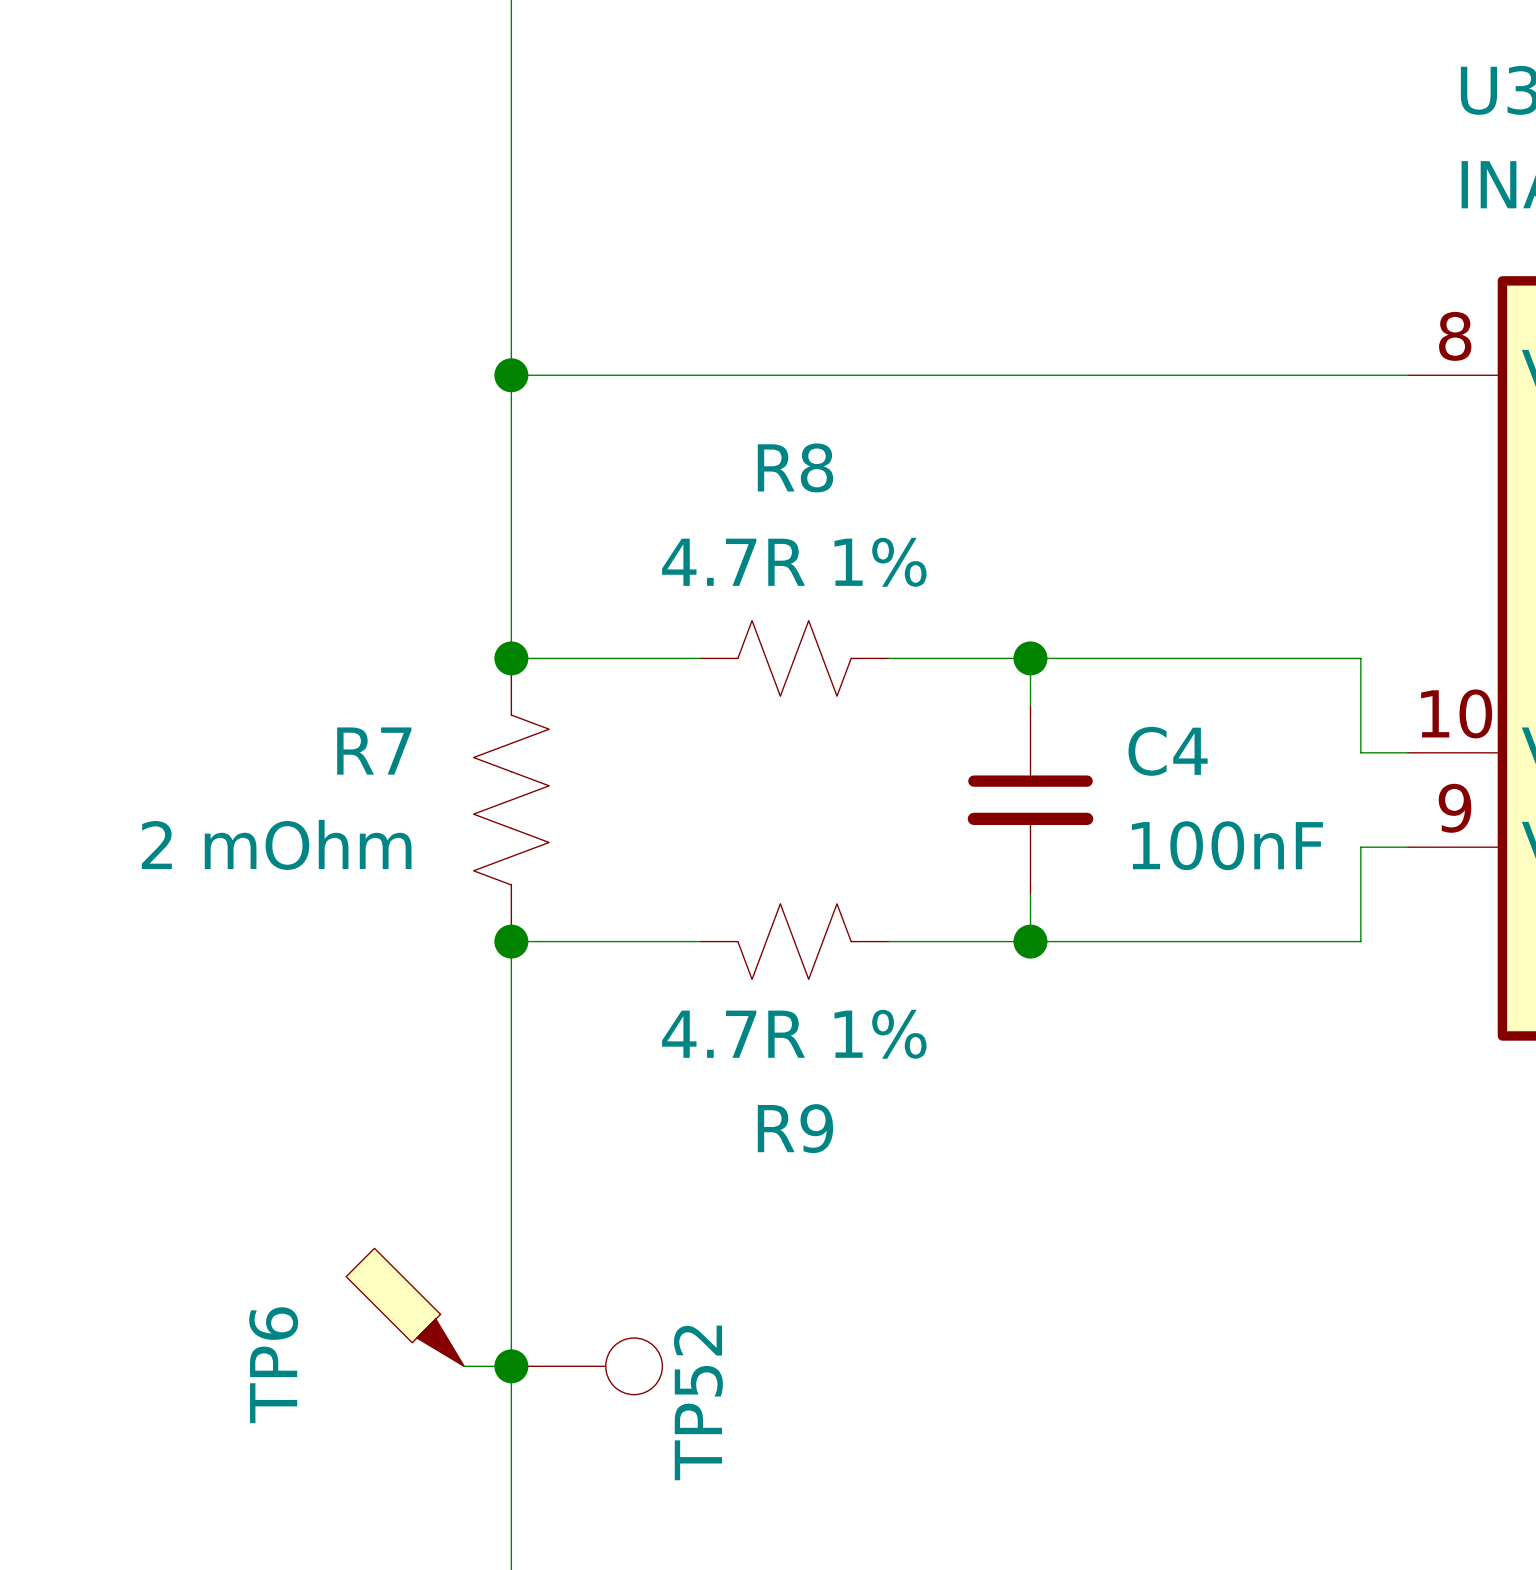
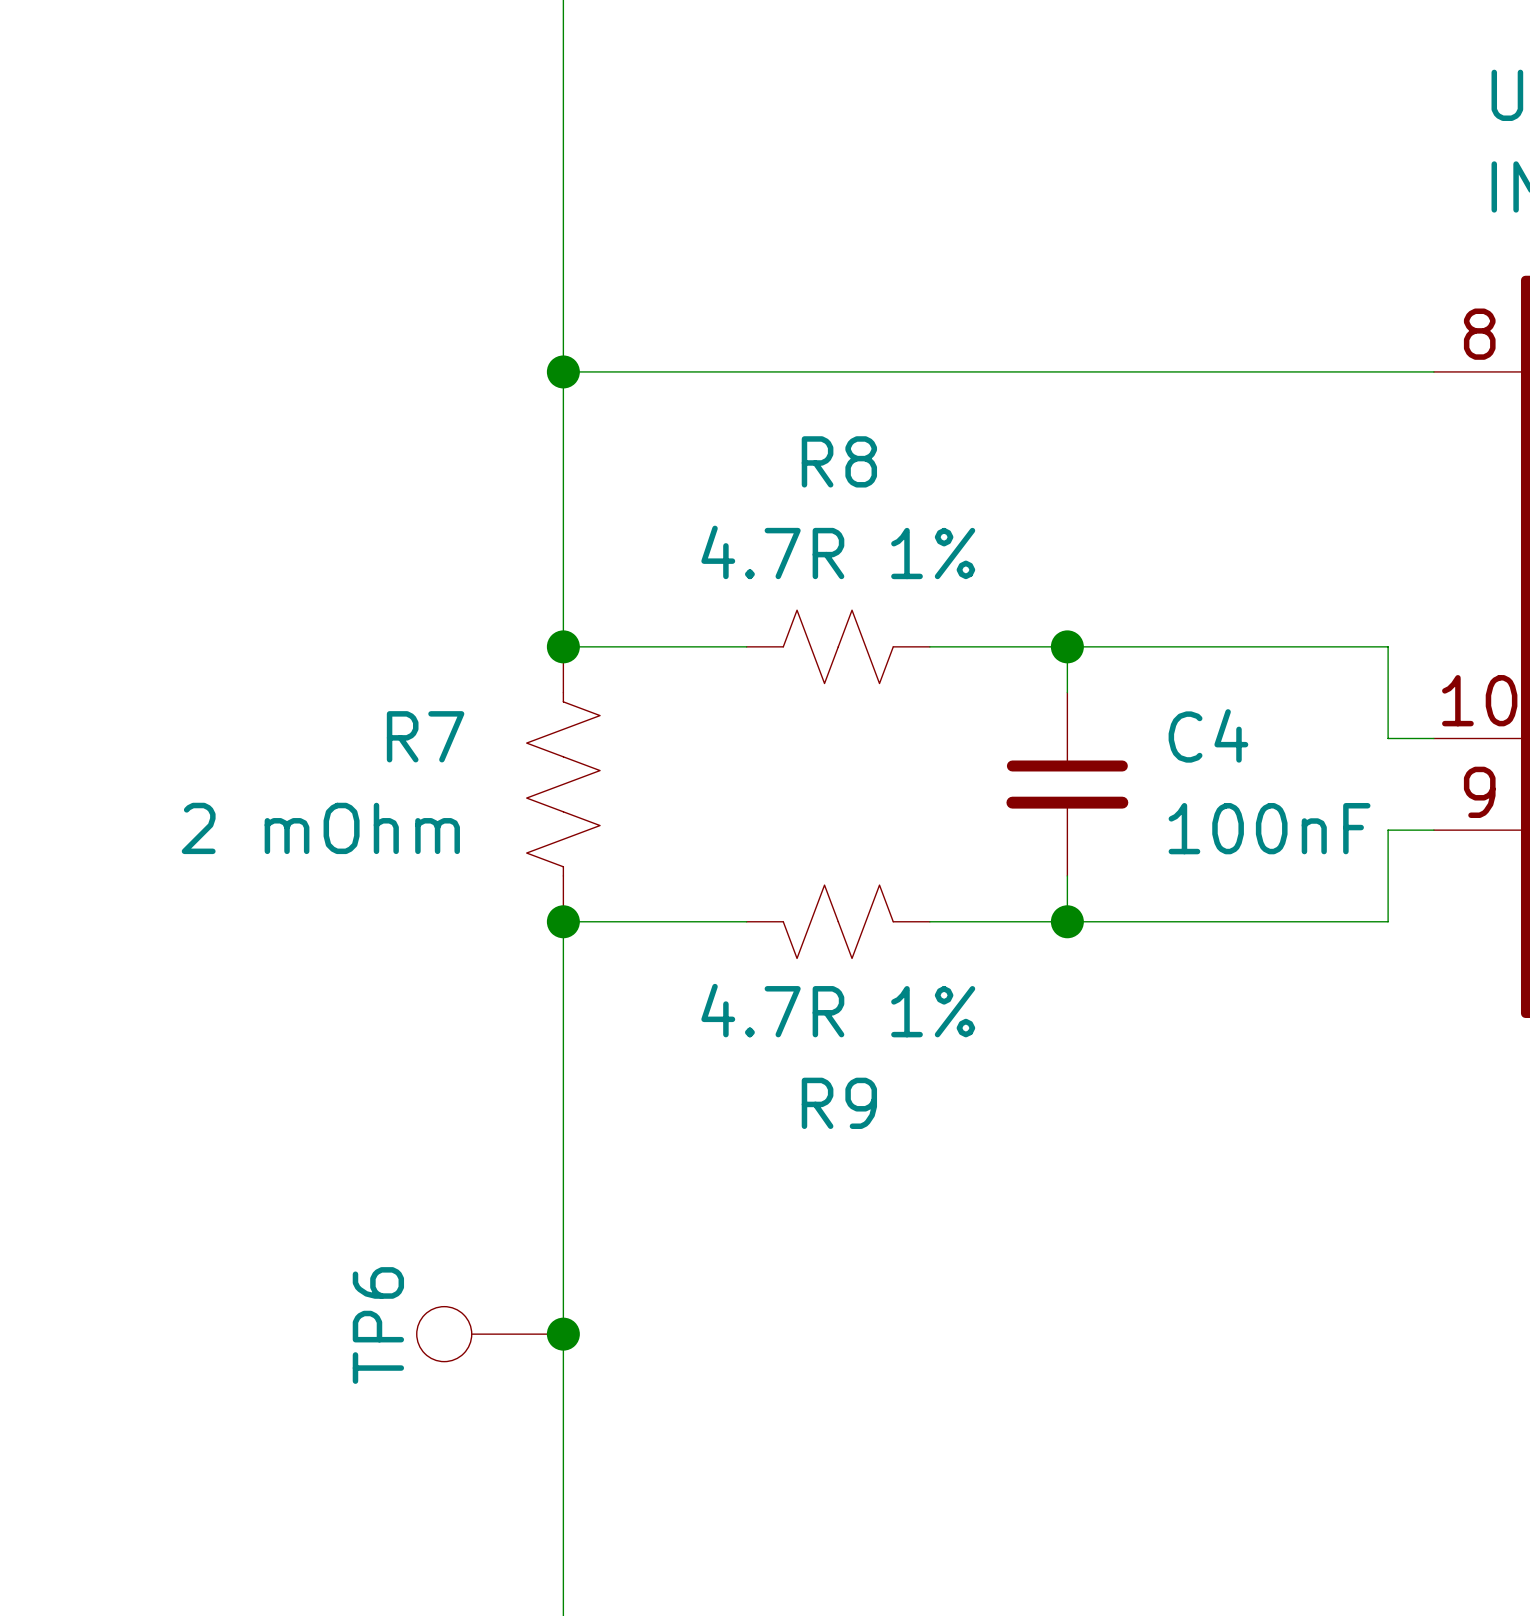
TP6 symbol: [346, 1248, 465, 1367] -> [416, 1306, 564, 1362]
TP52: (586, 1366) -> none

